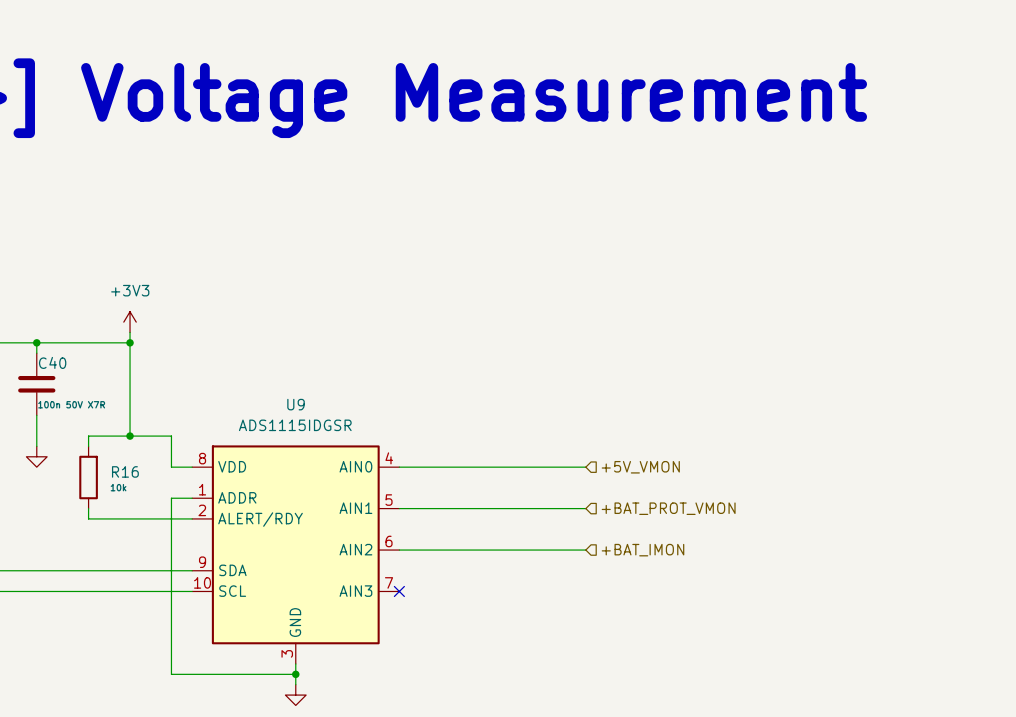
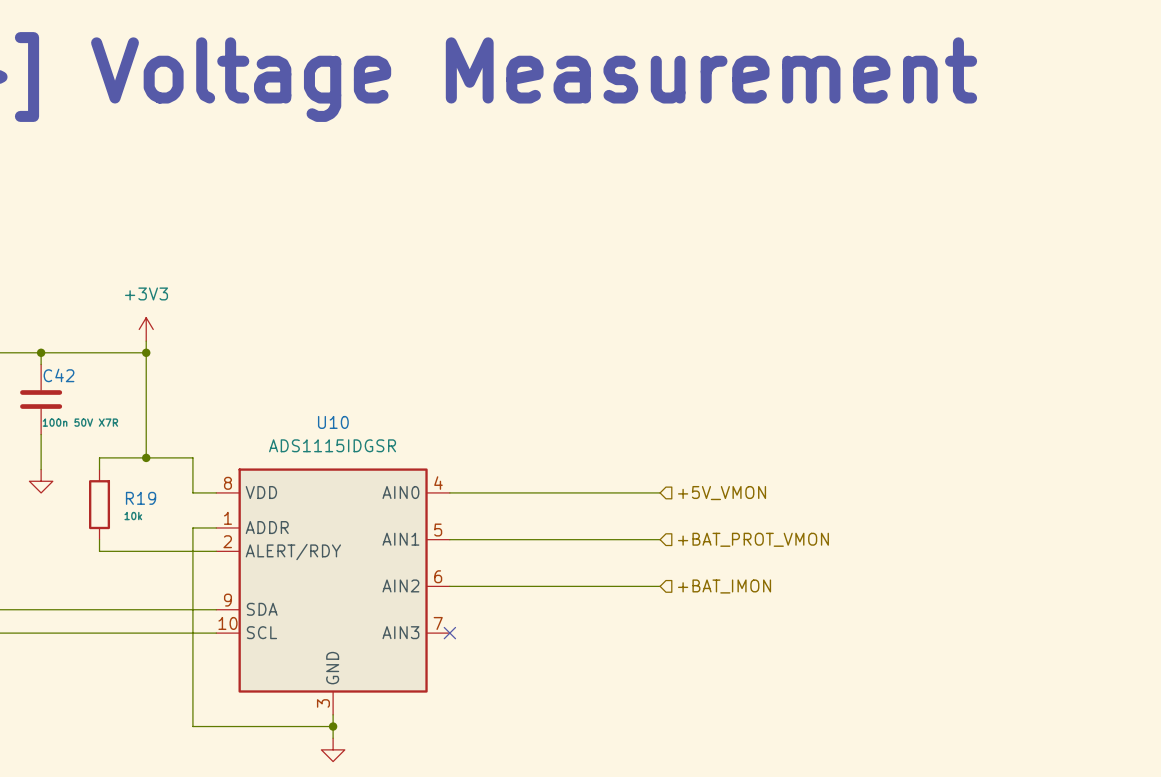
C40 name: C40 (52, 362) -> C42 (59, 375)
U9 name: U9 (296, 404) -> U10 (333, 422)
R16 name: R16 (125, 471) -> R19 (141, 498)

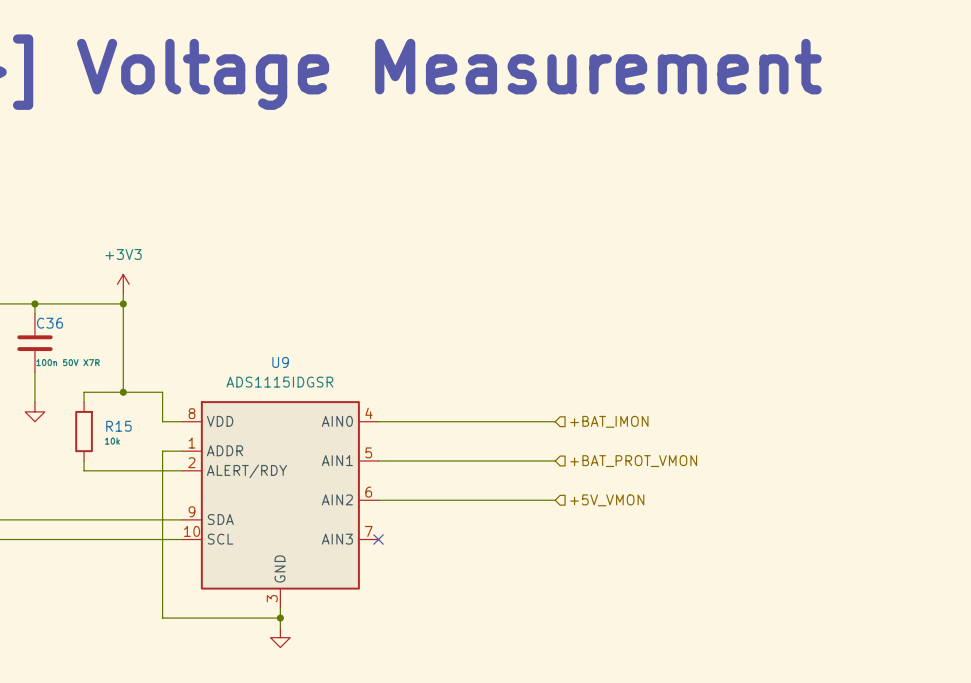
C42 name: C42 (59, 375) -> C36 (50, 323)
U10 name: U10 (333, 422) -> U9 (280, 362)
hierarchical label: +5V_VMON (722, 493) -> +BAT_IMON (609, 421)
R19 name: R19 (141, 498) -> R15 (118, 426)
hierarchical label: +BAT_IMON (724, 586) -> +5V_VMON (607, 500)

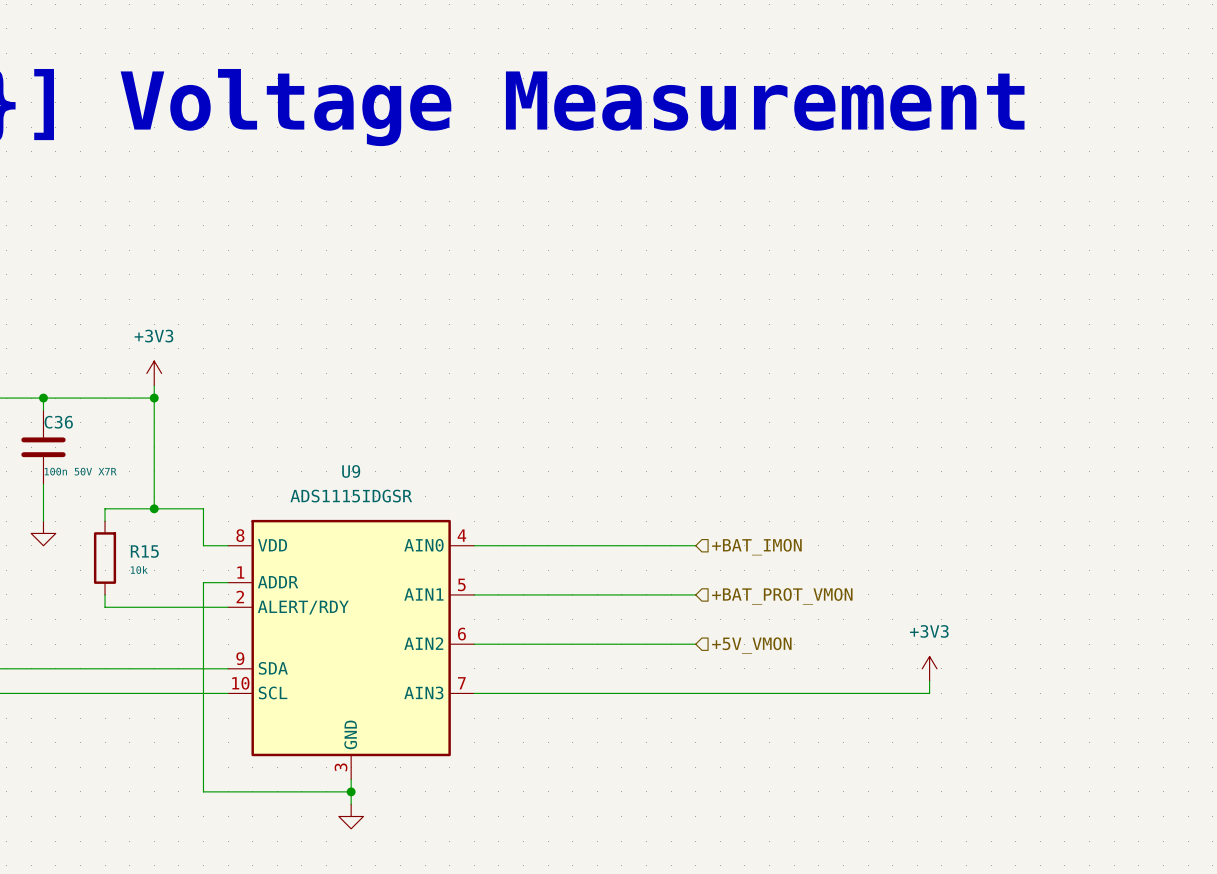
power symbol: none -> +3V3 (929, 668)
wire: none -> (929, 681) (929, 693) (474, 693)
no-connect mark: (378, 539) -> none

